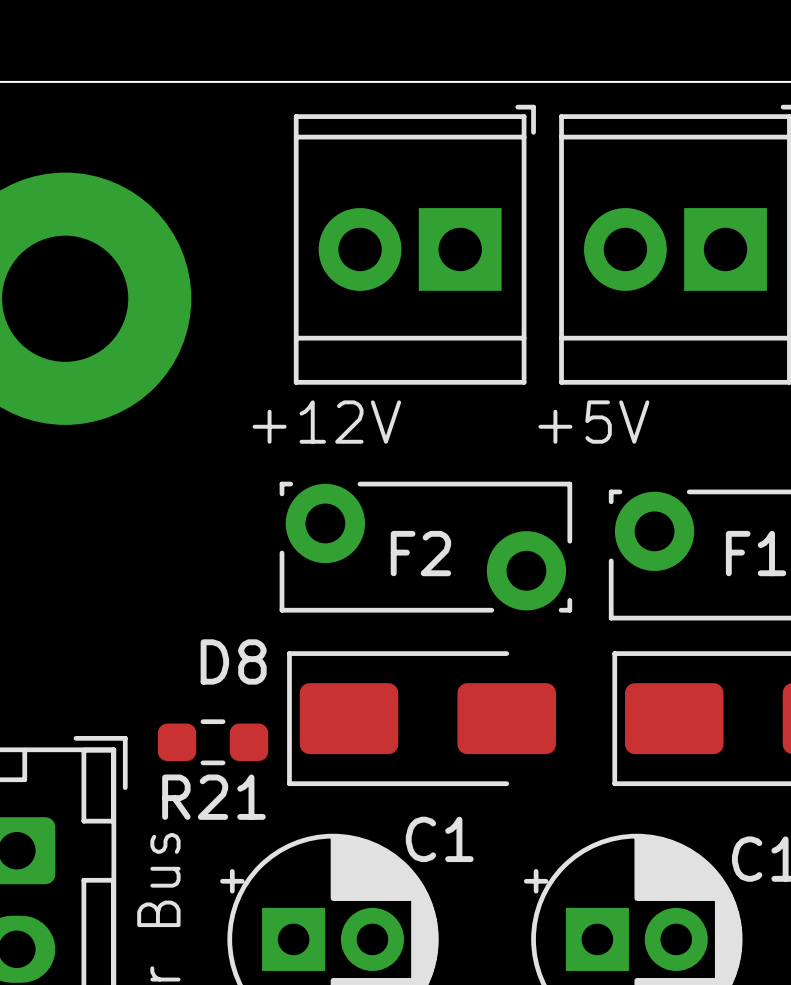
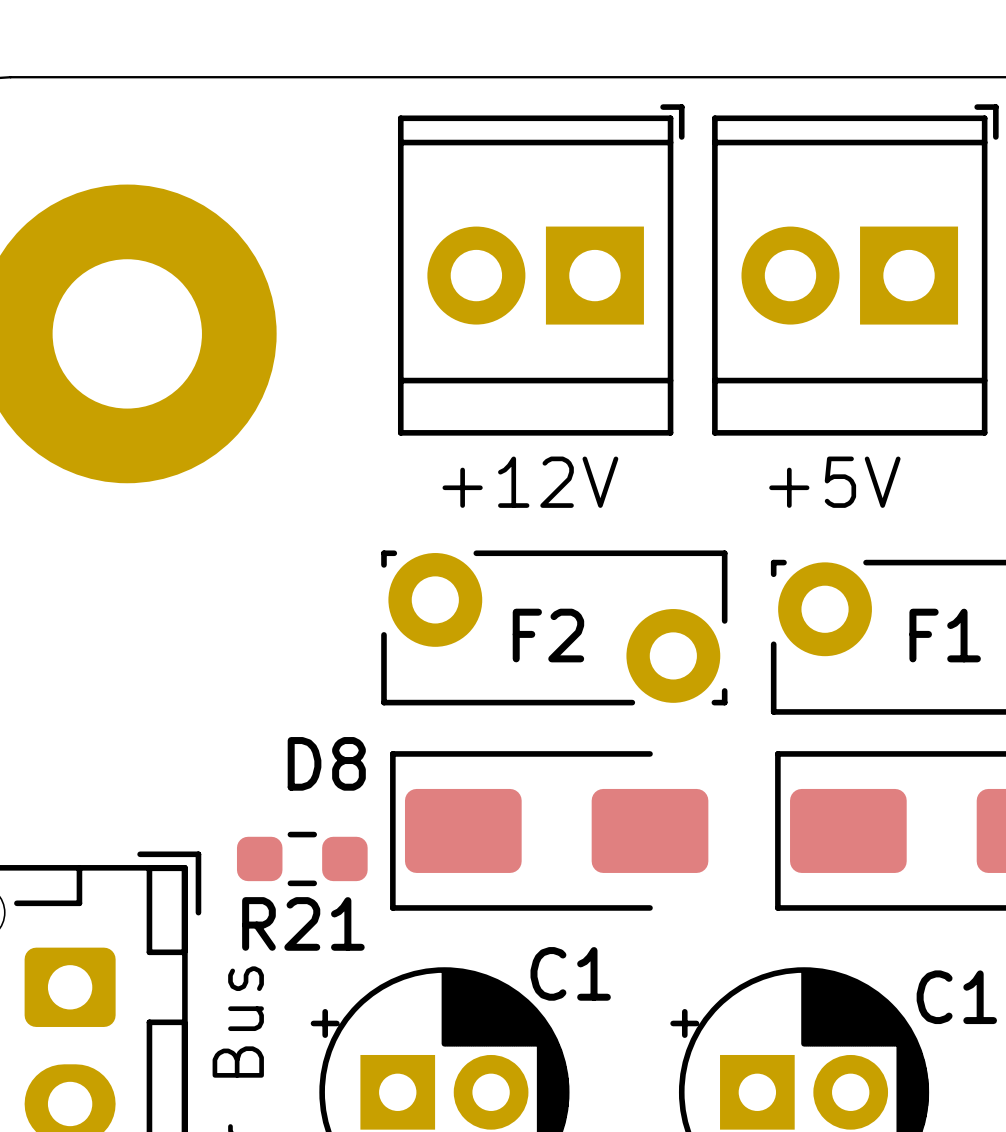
text position: +12V (326, 422) -> +12V (530, 482)
text position: +5V (593, 422) -> +5V (834, 482)

